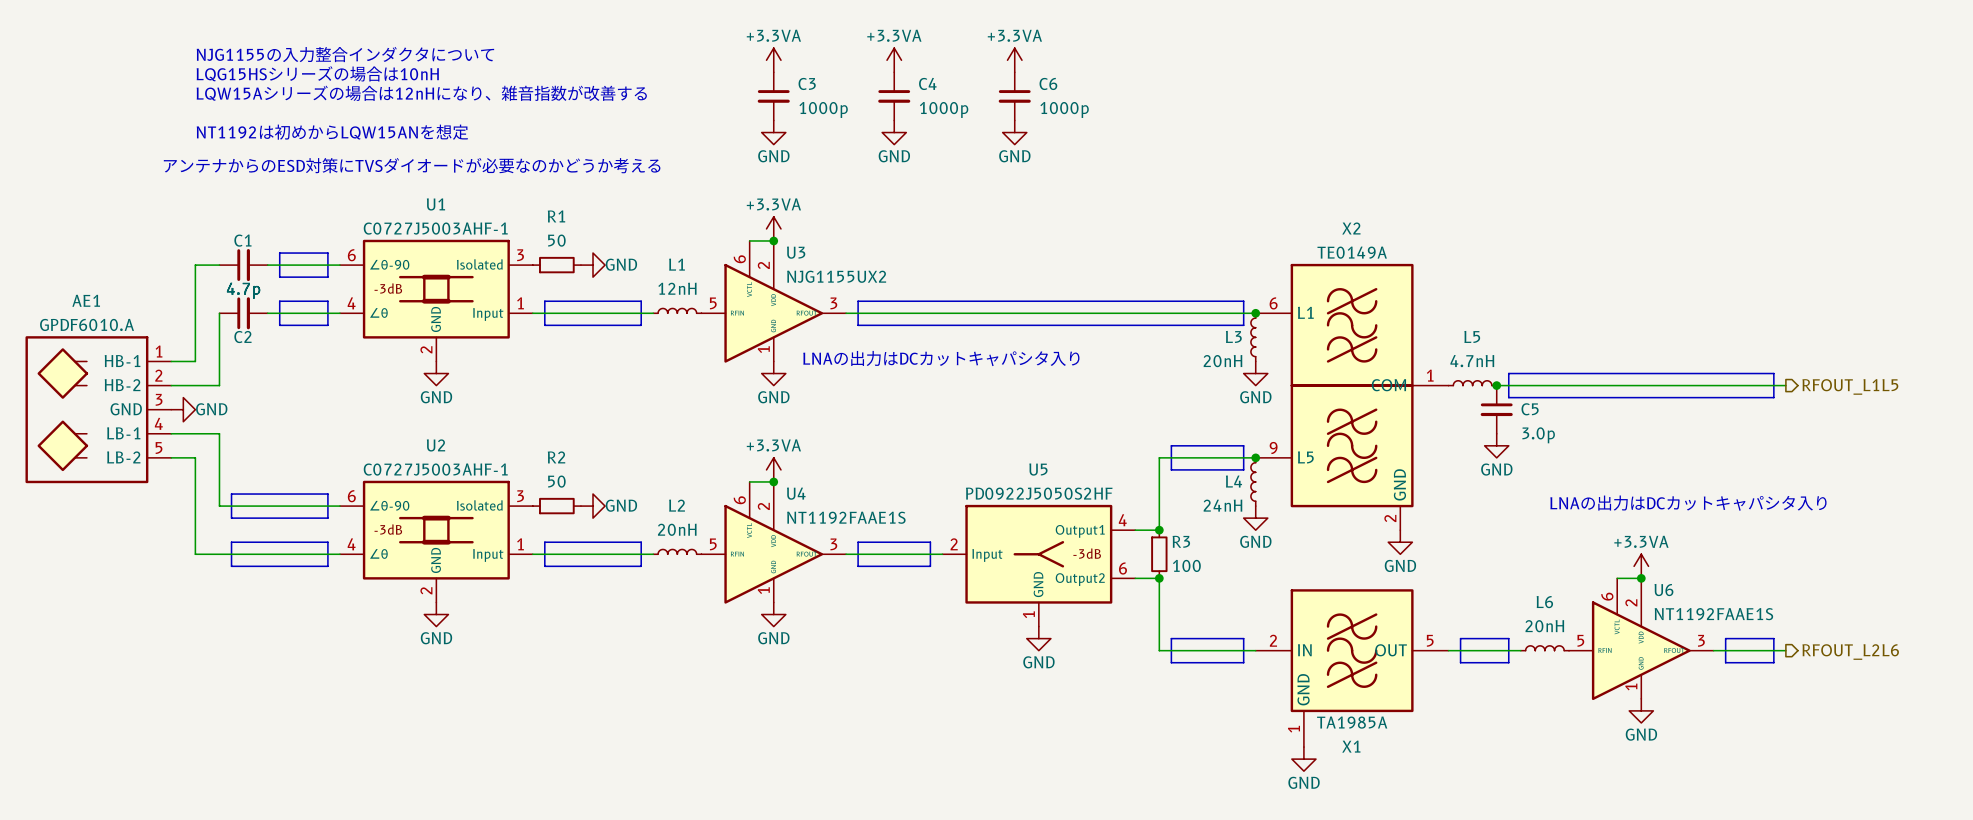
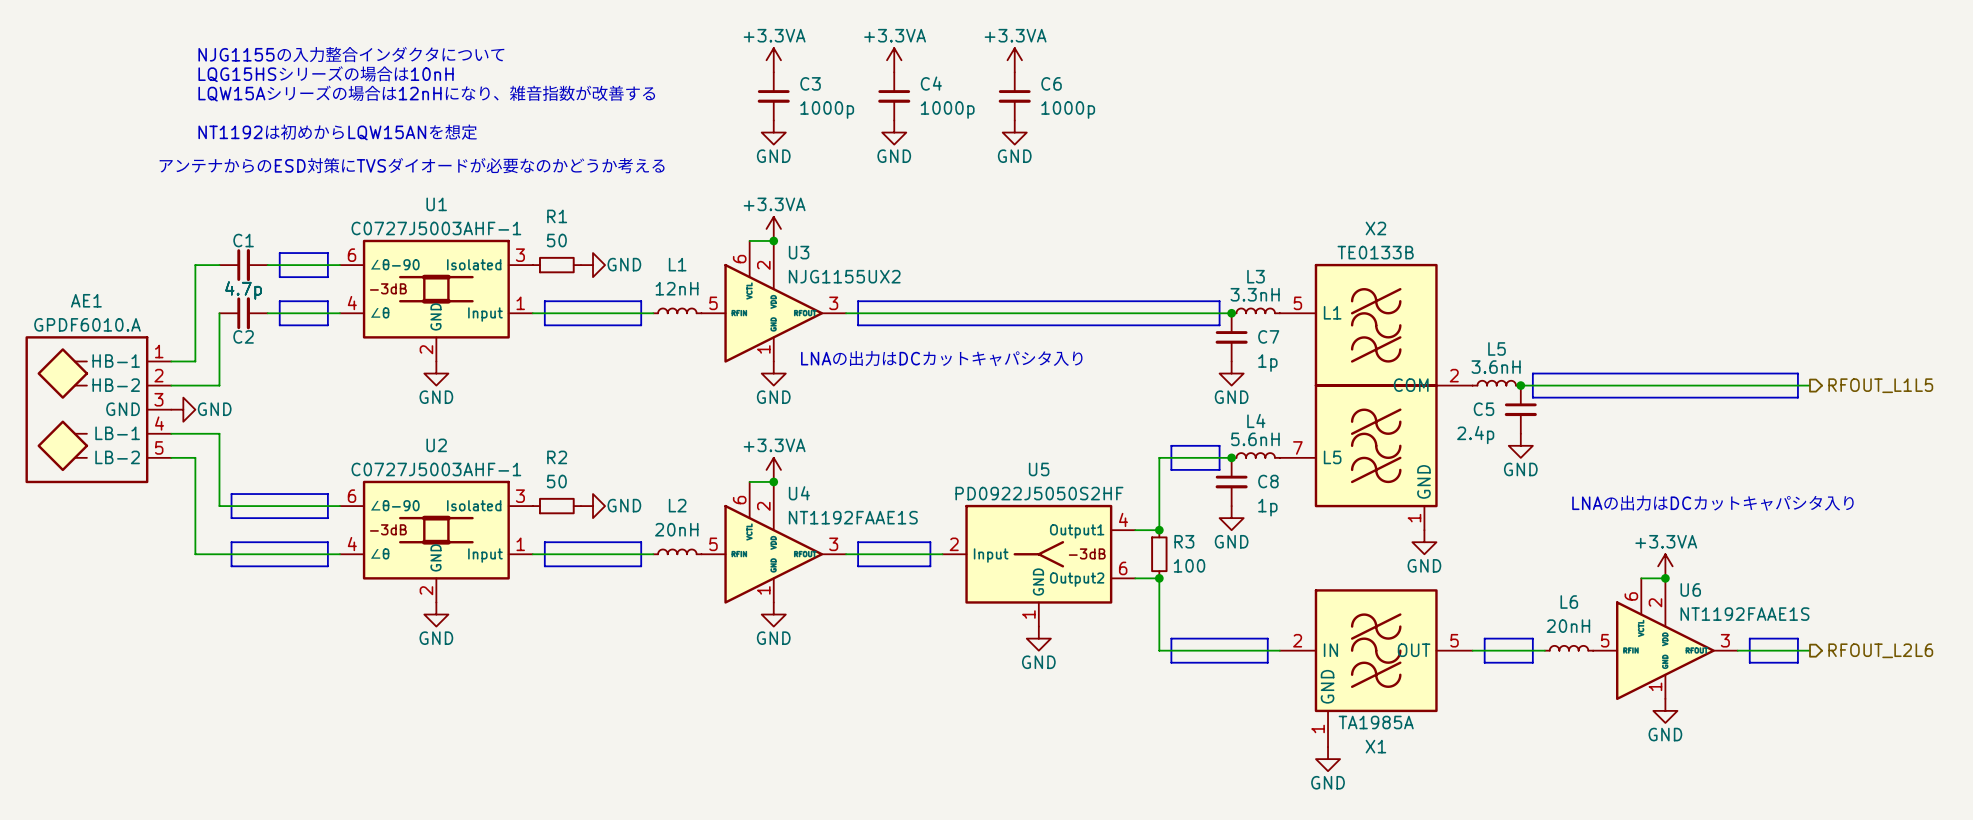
X2 value: TE0149A (1352, 252) -> TE0133B (1375, 252)
line: (1219, 301) (1243, 301) (1243, 325) (1219, 325) -> (1219, 301) (1219, 325)
X2 pin number: 6 (1273, 303) -> 5 (1297, 303)
wire: (1231, 313) (1255, 313) -> none
junction position: (1255, 313) -> (1231, 313)
L5 name position: L5 (1472, 336) -> L5 (1497, 348)
C7: none -> 1p (1231, 337)
L3 rotation: 0° (1253, 337) -> 90° clockwise (1255, 310)
L3 value: 20nH (1222, 361) -> 3.3nH (1255, 294)
L5 value: 4.7nH (1472, 361) -> 3.6nH (1496, 367)
power symbol position: GND (1255, 373) -> GND (1231, 373)
line: (1532, 373) (1508, 373) (1508, 397) (1532, 397) -> (1532, 373) (1532, 397)
line: (1773, 373) (1773, 397) -> (1773, 373) (1797, 373) (1797, 397) (1773, 397)
X2 pin number: 1 (1430, 375) -> 2 (1454, 375)
L5 position: (1472, 383) -> (1496, 383)
wire: (1496, 385) (1520, 385) -> none
junction position: (1496, 385) -> (1520, 385)
wire: none -> (1785, 385) (1810, 385)
hierarchical label position: RFOUT_L1L5 (1850, 386) -> RFOUT_L1L5 (1880, 385)
X2 position: (1352, 397) -> (1376, 397)
C5 position: (1496, 409) -> (1520, 409)
C5 name position: C5 (1530, 409) -> C5 (1484, 409)
C5 value: 3.0p (1538, 435) -> 2.4p (1475, 435)
line: (1219, 445) (1243, 445) (1243, 469) (1219, 469) -> (1219, 445) (1219, 469)
power symbol position: GND (1496, 445) -> GND (1520, 445)
X2 pin number: 9 (1273, 448) -> 7 (1297, 447)
junction position: (1255, 457) -> (1231, 457)
C8: none -> 1p (1231, 481)
L4 rotation: 0° (1253, 481) -> 90° clockwise (1255, 455)
text position: LNAの出力はDCカットキャパシタ入り (1688, 503) -> LNAの出力はDCカットキャパシタ入り (1713, 503)
L4 value: 24nH (1222, 505) -> 5.6nH (1255, 439)
power symbol position: GND (1255, 518) -> GND (1231, 518)
X2 pin number: 2 (1390, 518) -> 1 (1414, 518)
power symbol position: GND (1400, 542) -> GND (1424, 542)
power symbol position: +3.3VA (1641, 566) -> +3.3VA (1665, 566)
wire: (1617, 578) (1641, 578) -> (1665, 578) (1641, 578)
junction position: (1641, 578) -> (1665, 578)
line: (1243, 638) (1243, 662) -> (1243, 638) (1267, 638) (1267, 662) (1243, 662)
line: (1484, 638) (1460, 638) (1460, 662) (1484, 662) -> (1484, 638) (1484, 662)
line: (1508, 638) (1508, 662) -> (1508, 638) (1532, 638) (1532, 662) (1508, 662)
line: (1749, 638) (1725, 638) (1725, 662) (1749, 662) -> (1749, 638) (1749, 662)
line: (1773, 638) (1773, 662) -> (1773, 638) (1797, 638) (1797, 662) (1773, 662)
U6 position: (1641, 639) -> (1665, 639)
L6 position: (1544, 648) -> (1569, 648)
hierarchical label position: RFOUT_L2L6 (1850, 652) -> RFOUT_L2L6 (1880, 650)
X1 position: (1352, 668) -> (1376, 668)
power symbol position: GND (1641, 710) -> GND (1665, 710)
power symbol position: GND (1303, 759) -> GND (1328, 759)

